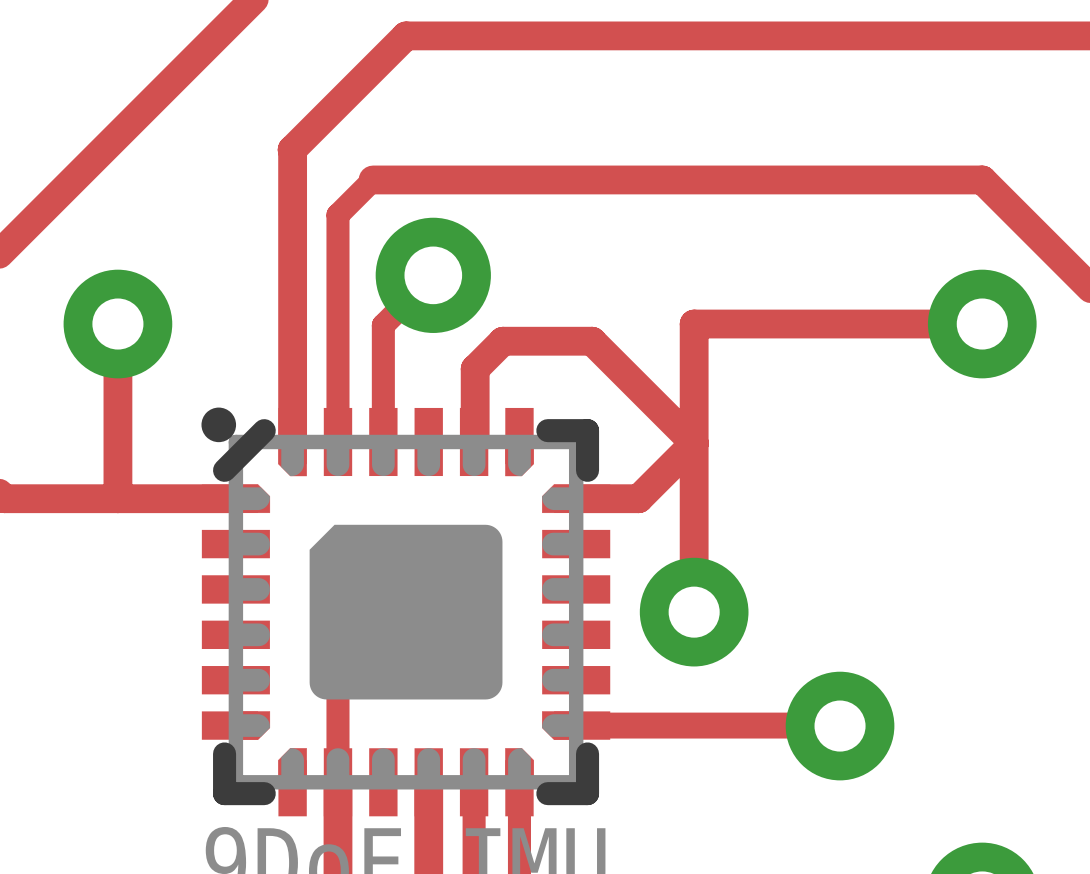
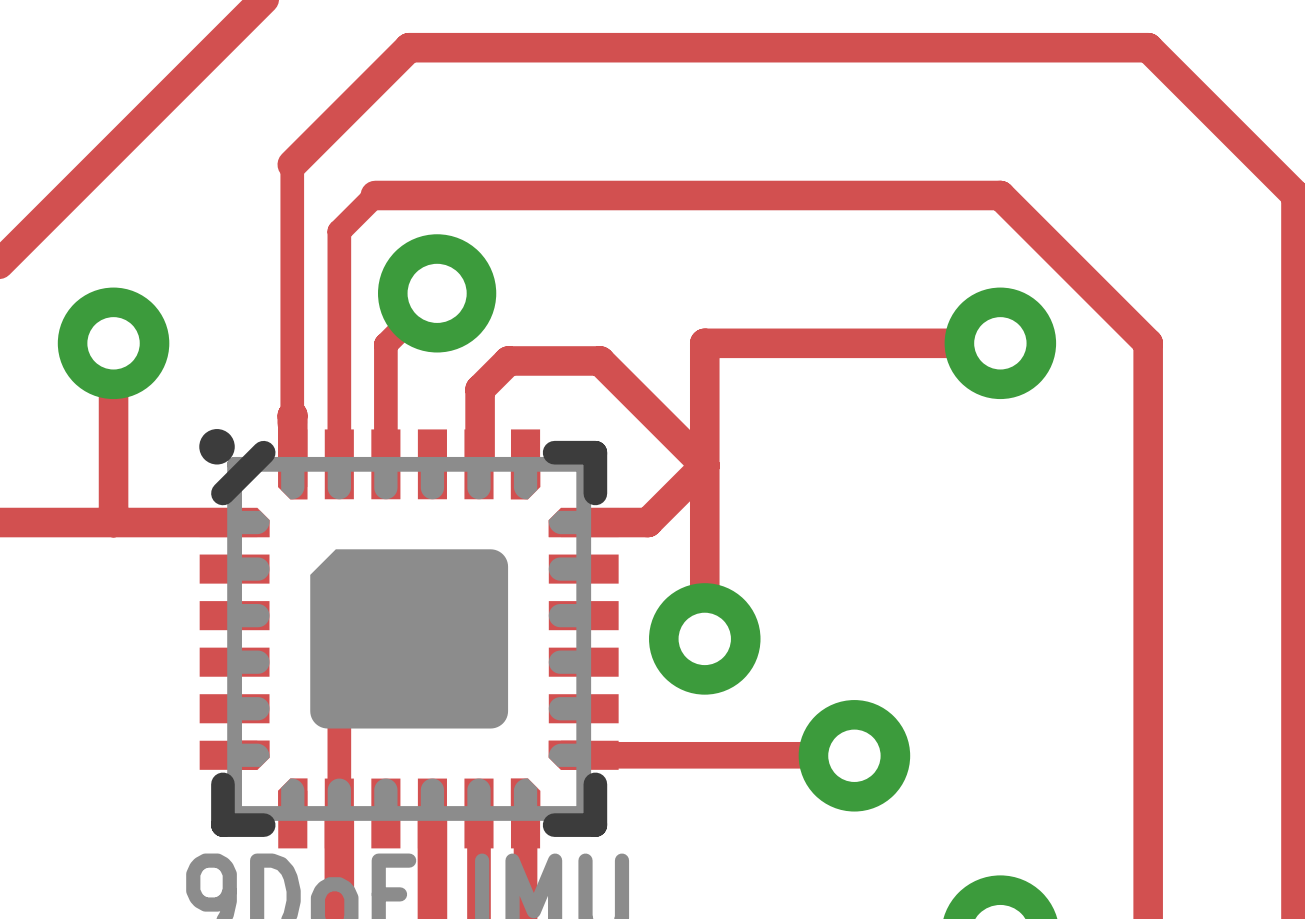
track width: thick (292, 150) (292, 394) -> thin (292, 165) (292, 415)

